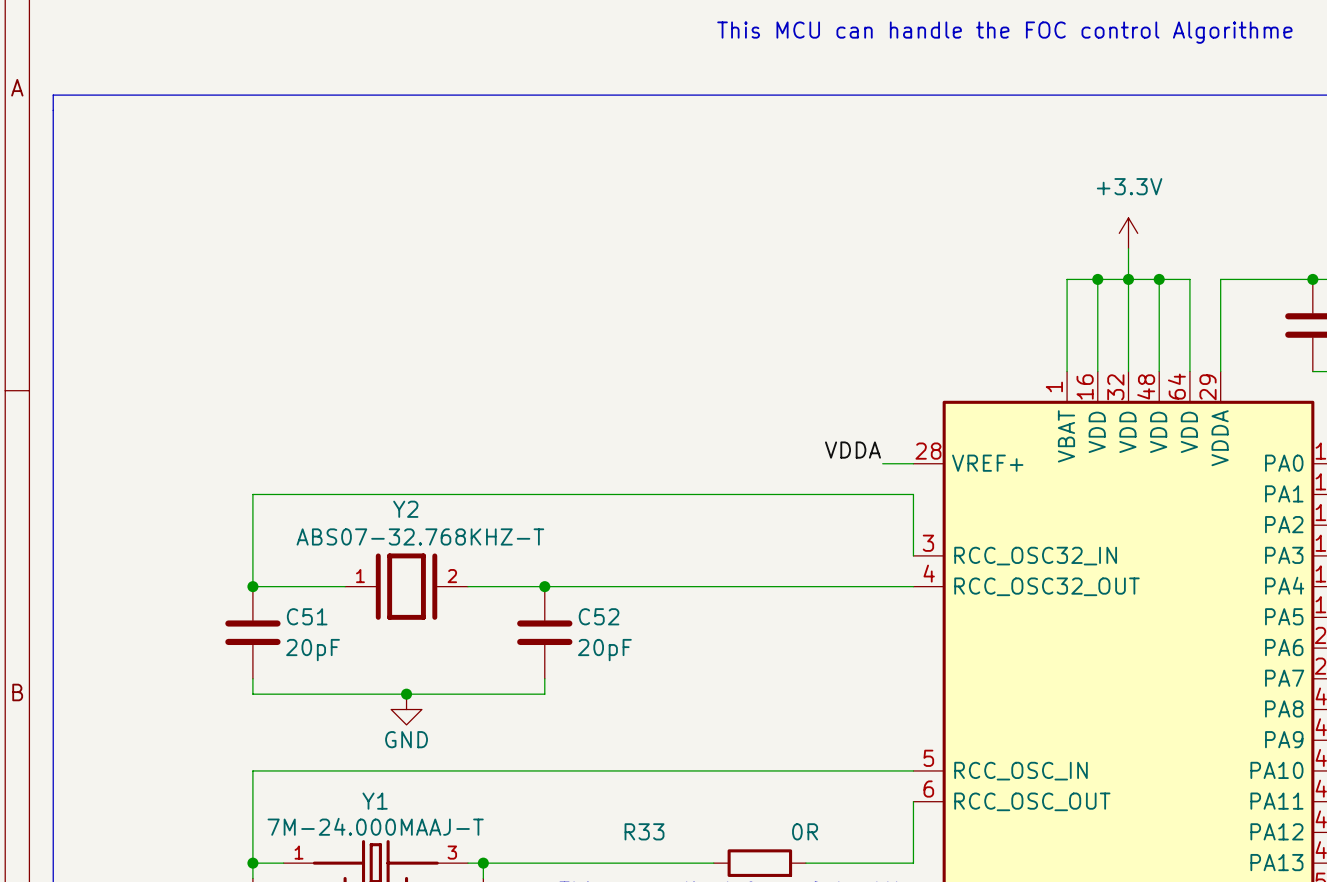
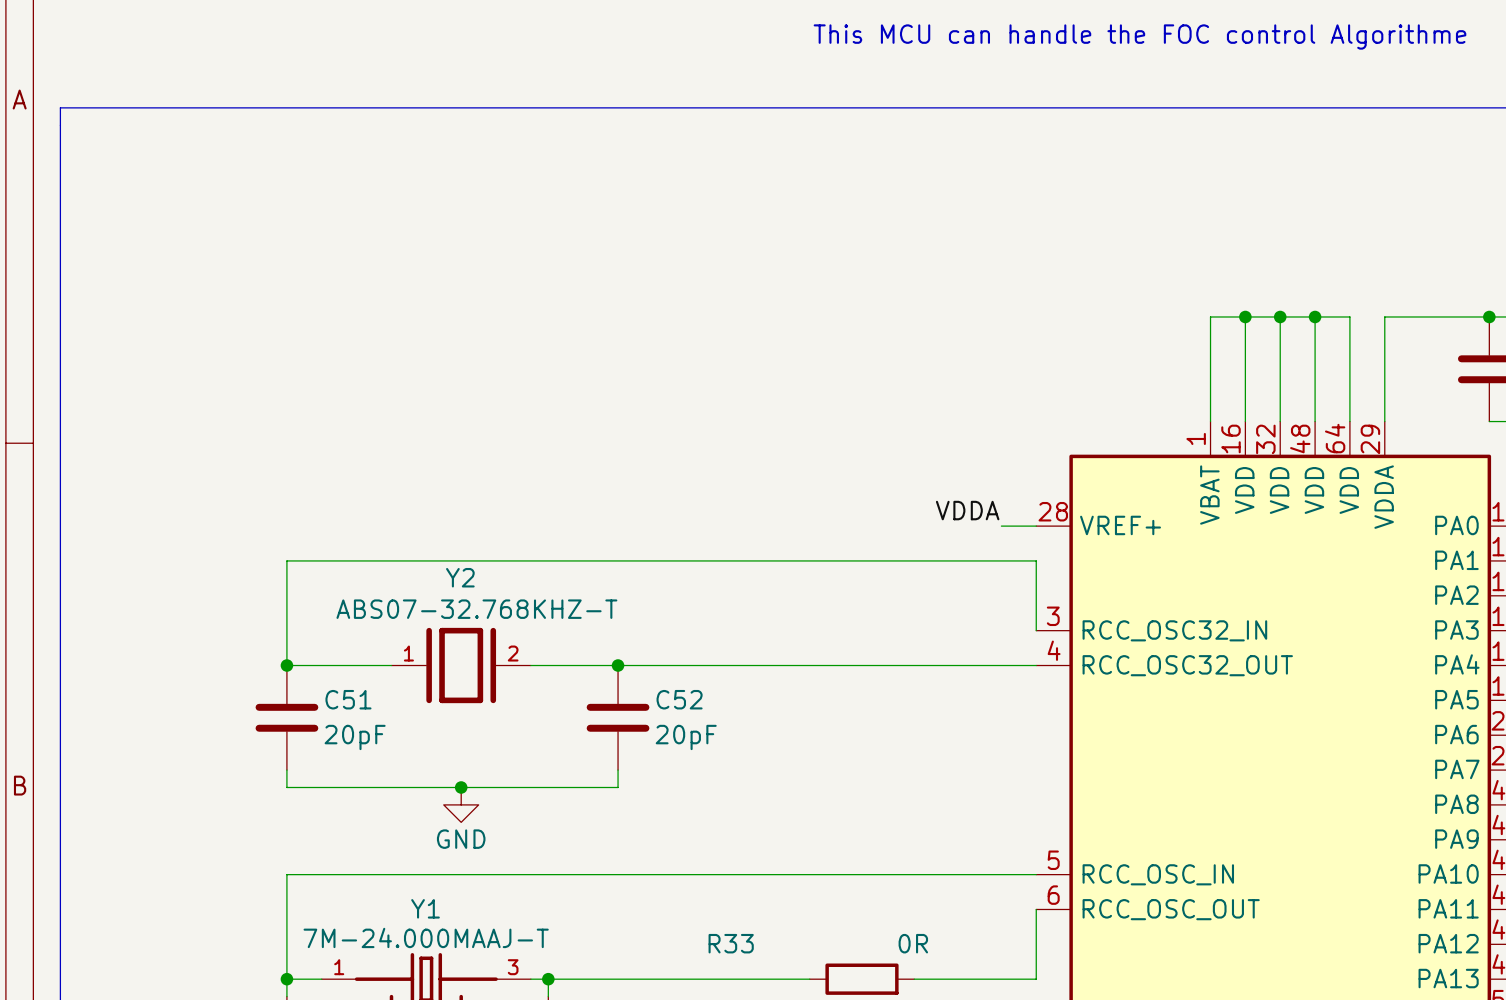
power symbol: +3.3V (1128, 233) -> none
wire: (1128, 248) (1128, 279) -> none

